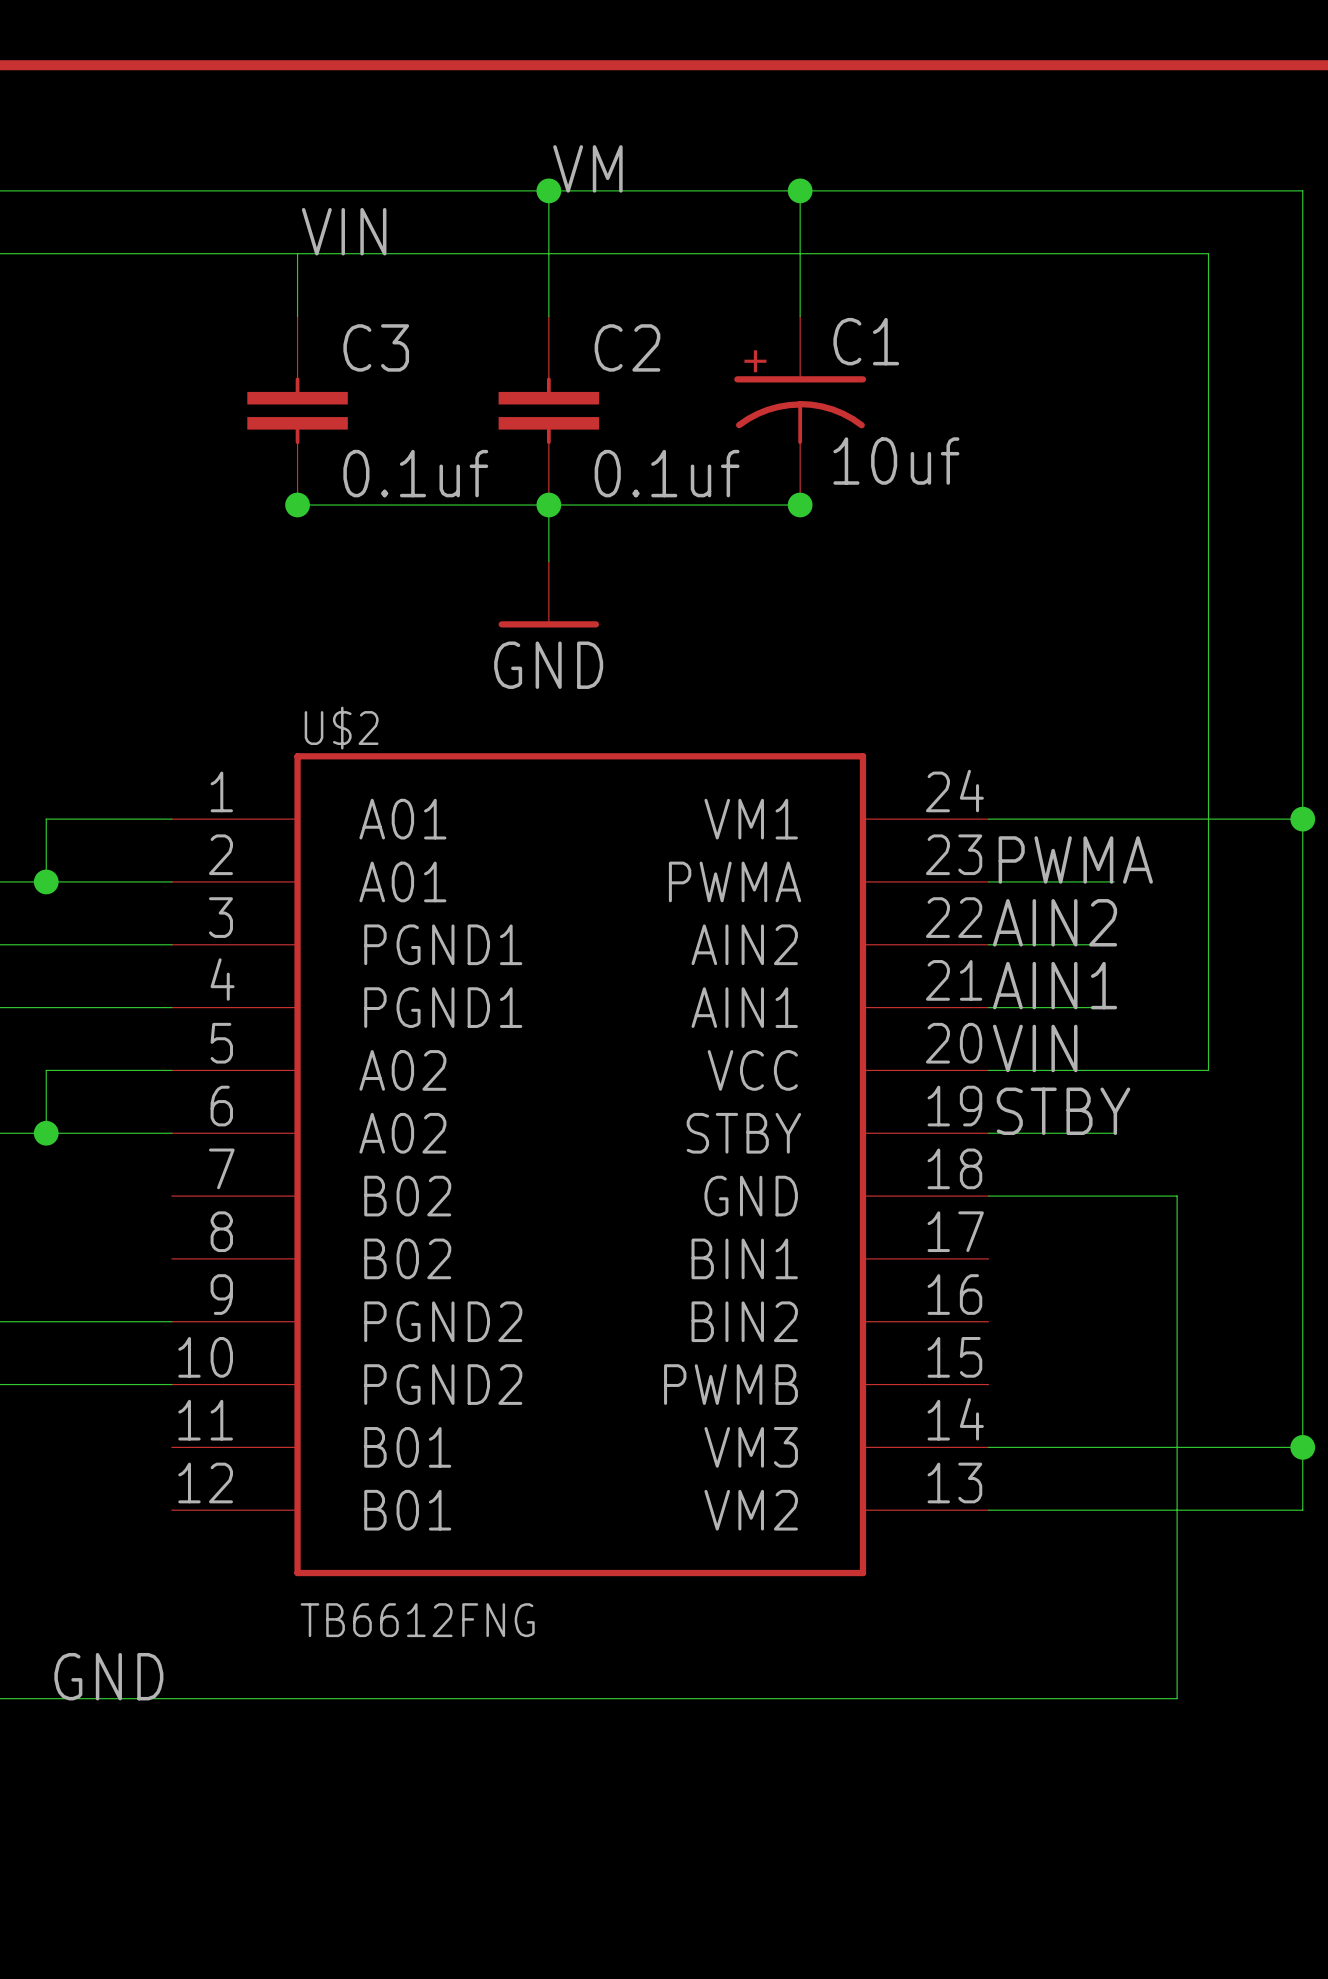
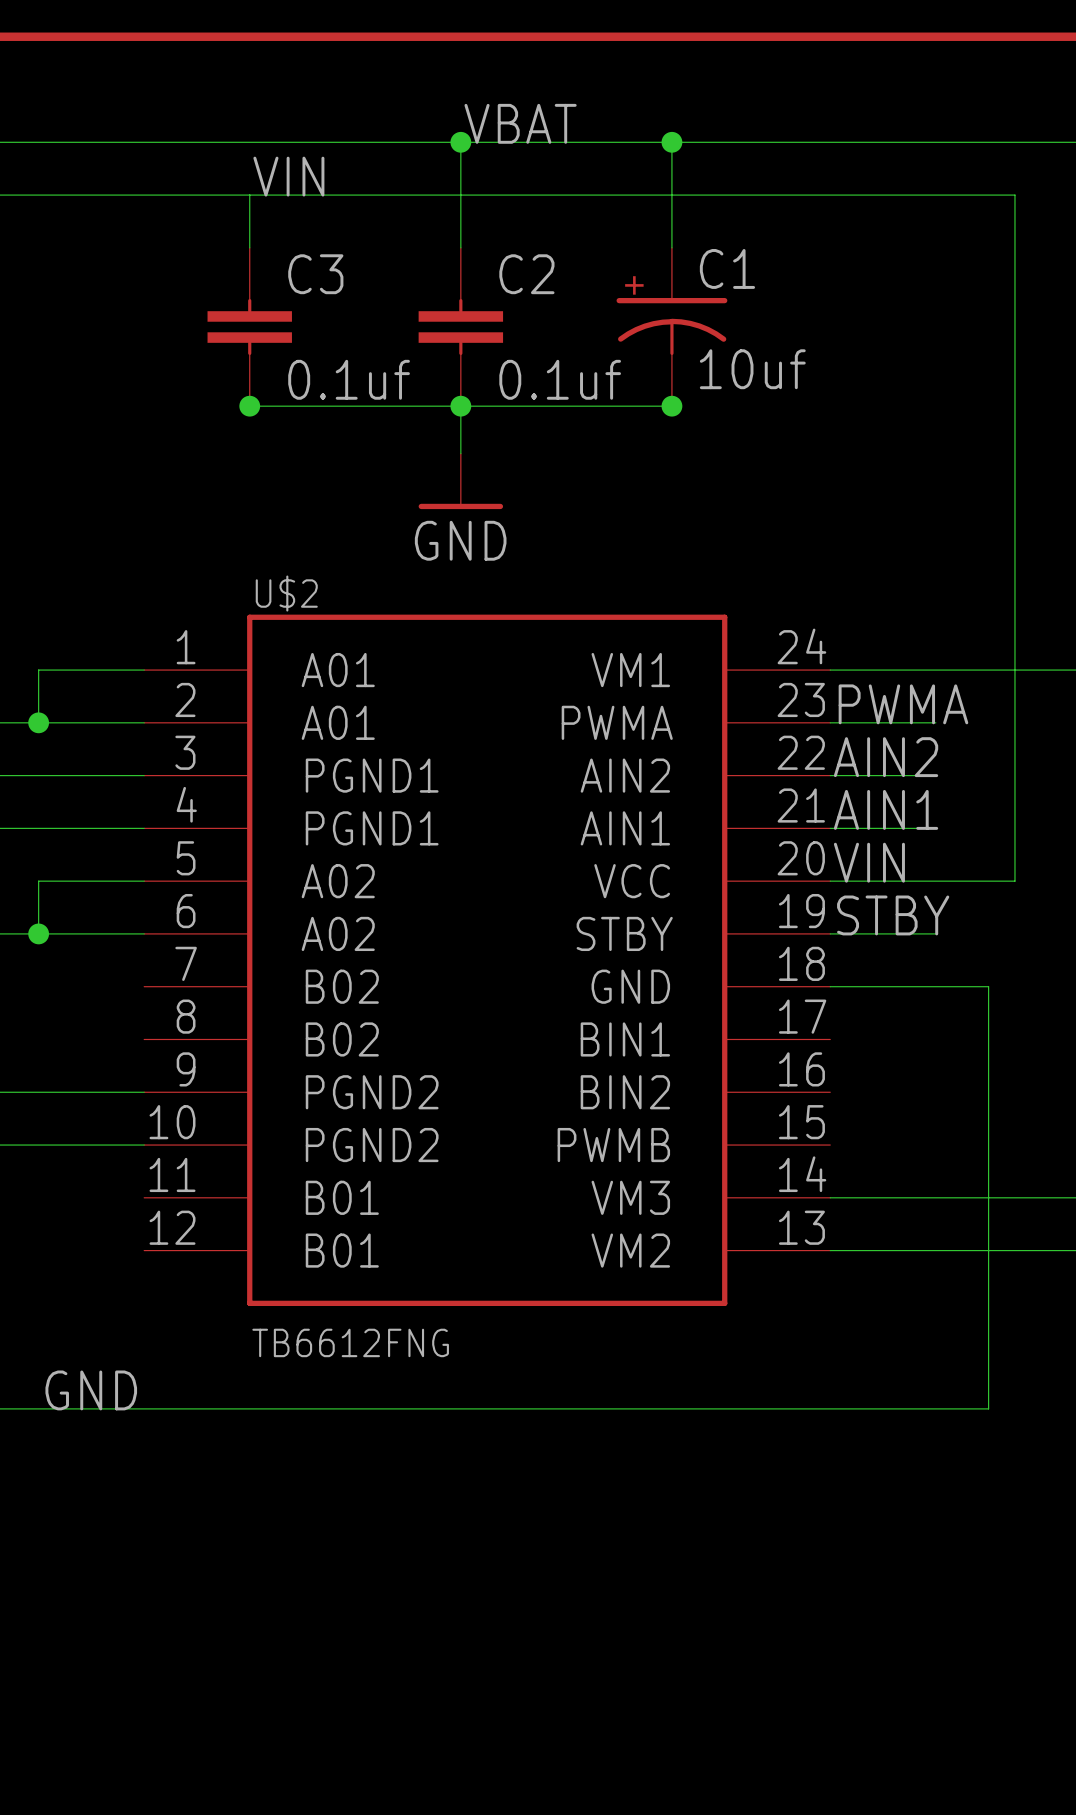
label: VM (587, 168) -> VBAT (520, 123)

